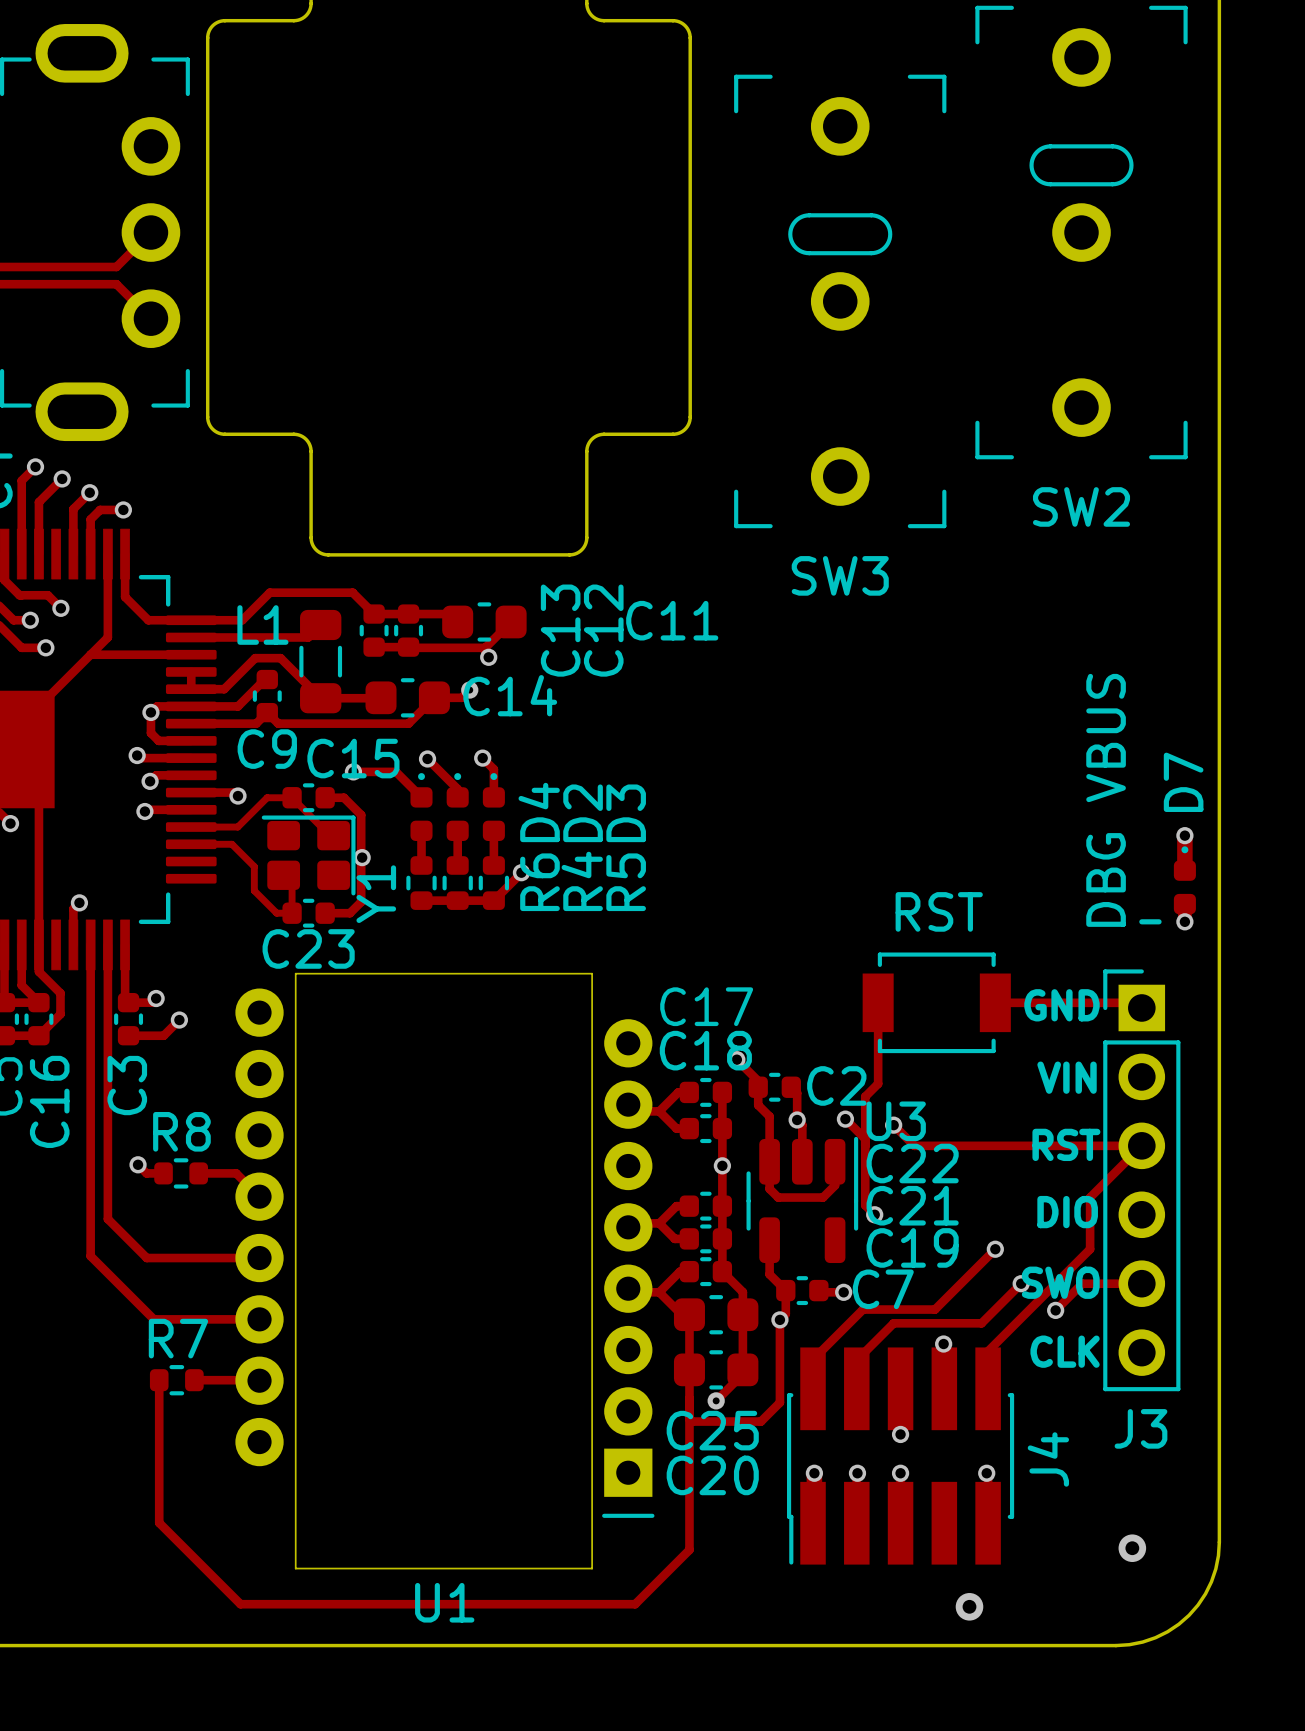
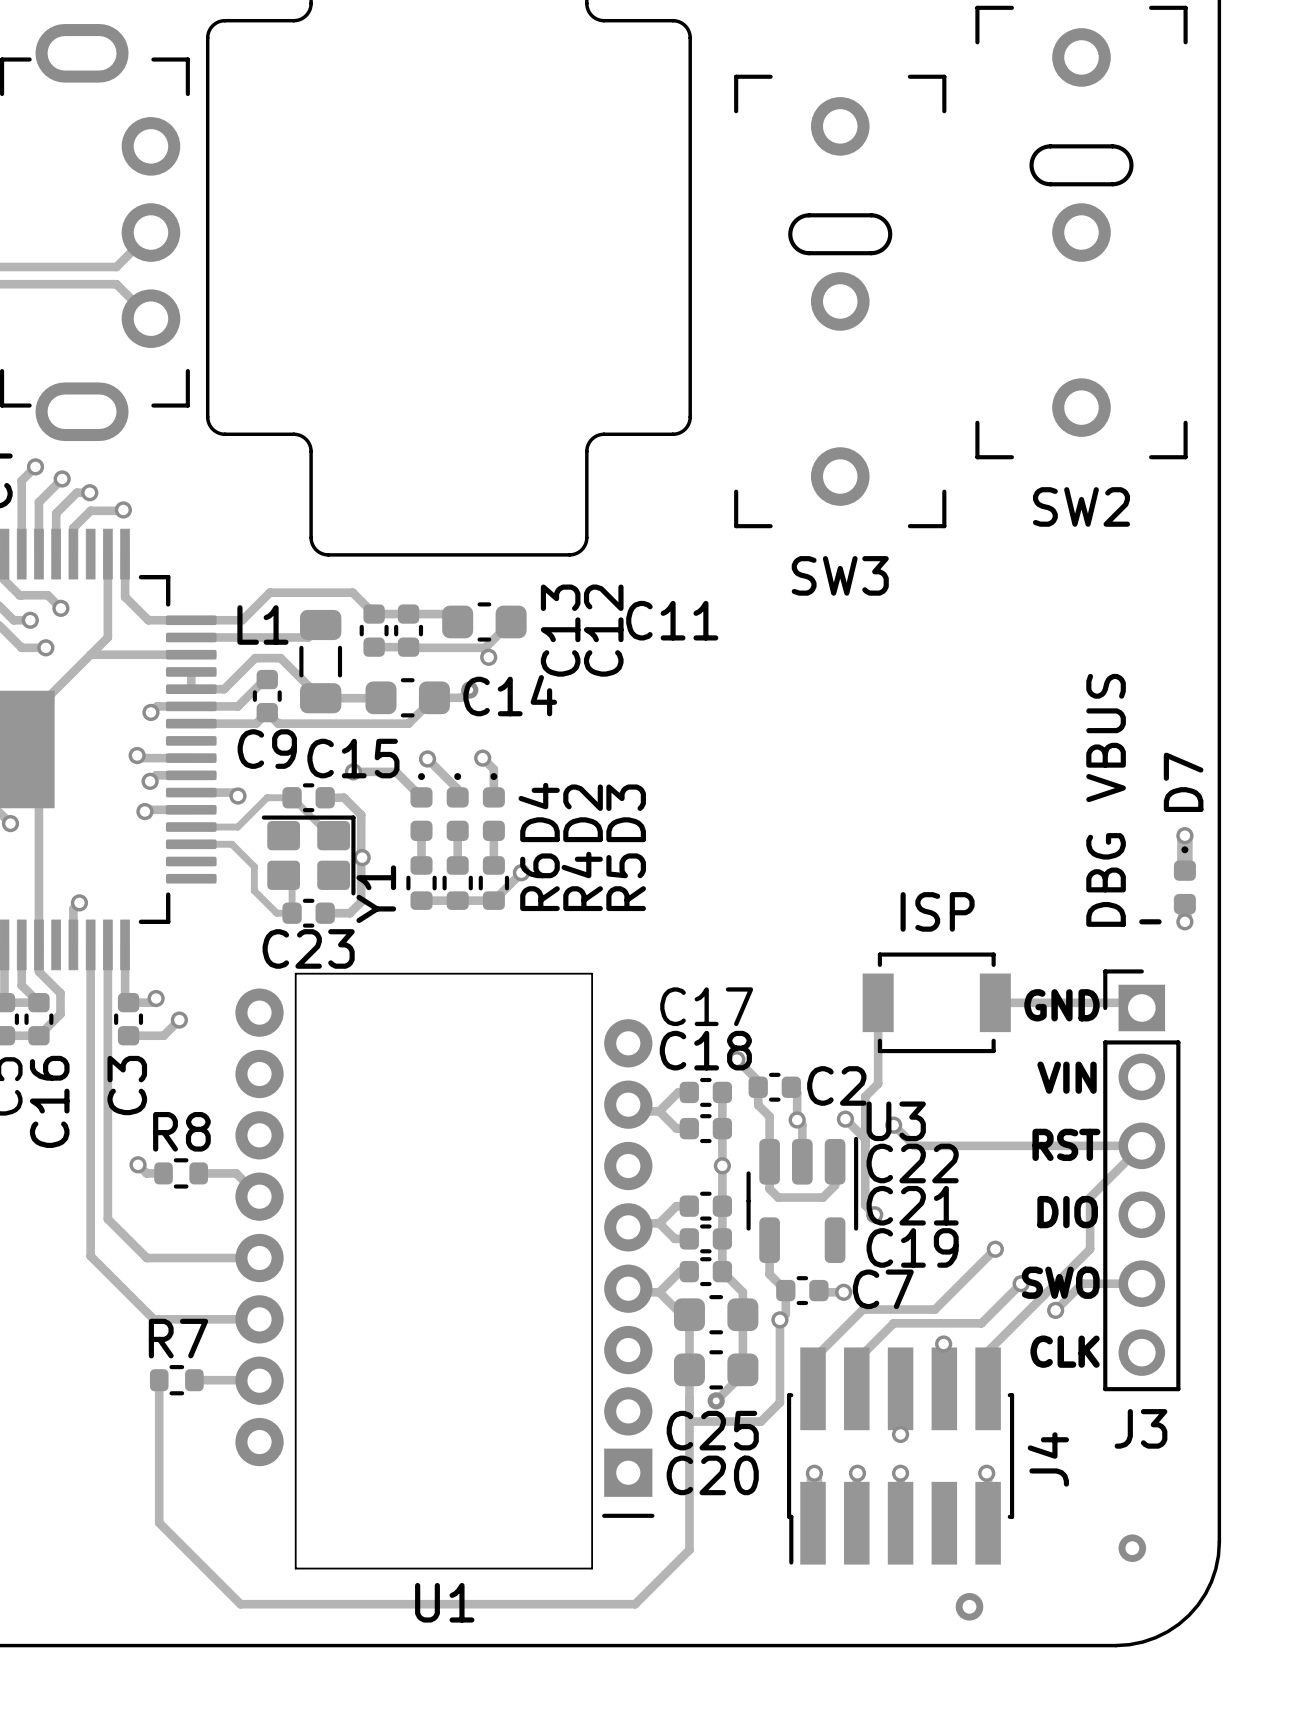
track: (89, 492) (73, 509) (73, 527) -> (89, 492) (76, 492) (56, 513) (56, 554)
track: (123, 509) (100, 509) (90, 519) (90, 554) -> (123, 509) (90, 510) (73, 527)
track: (150, 712) (150, 733) (158, 740) (191, 740) -> none
part text: RST (939, 911) -> ISP (937, 911)

